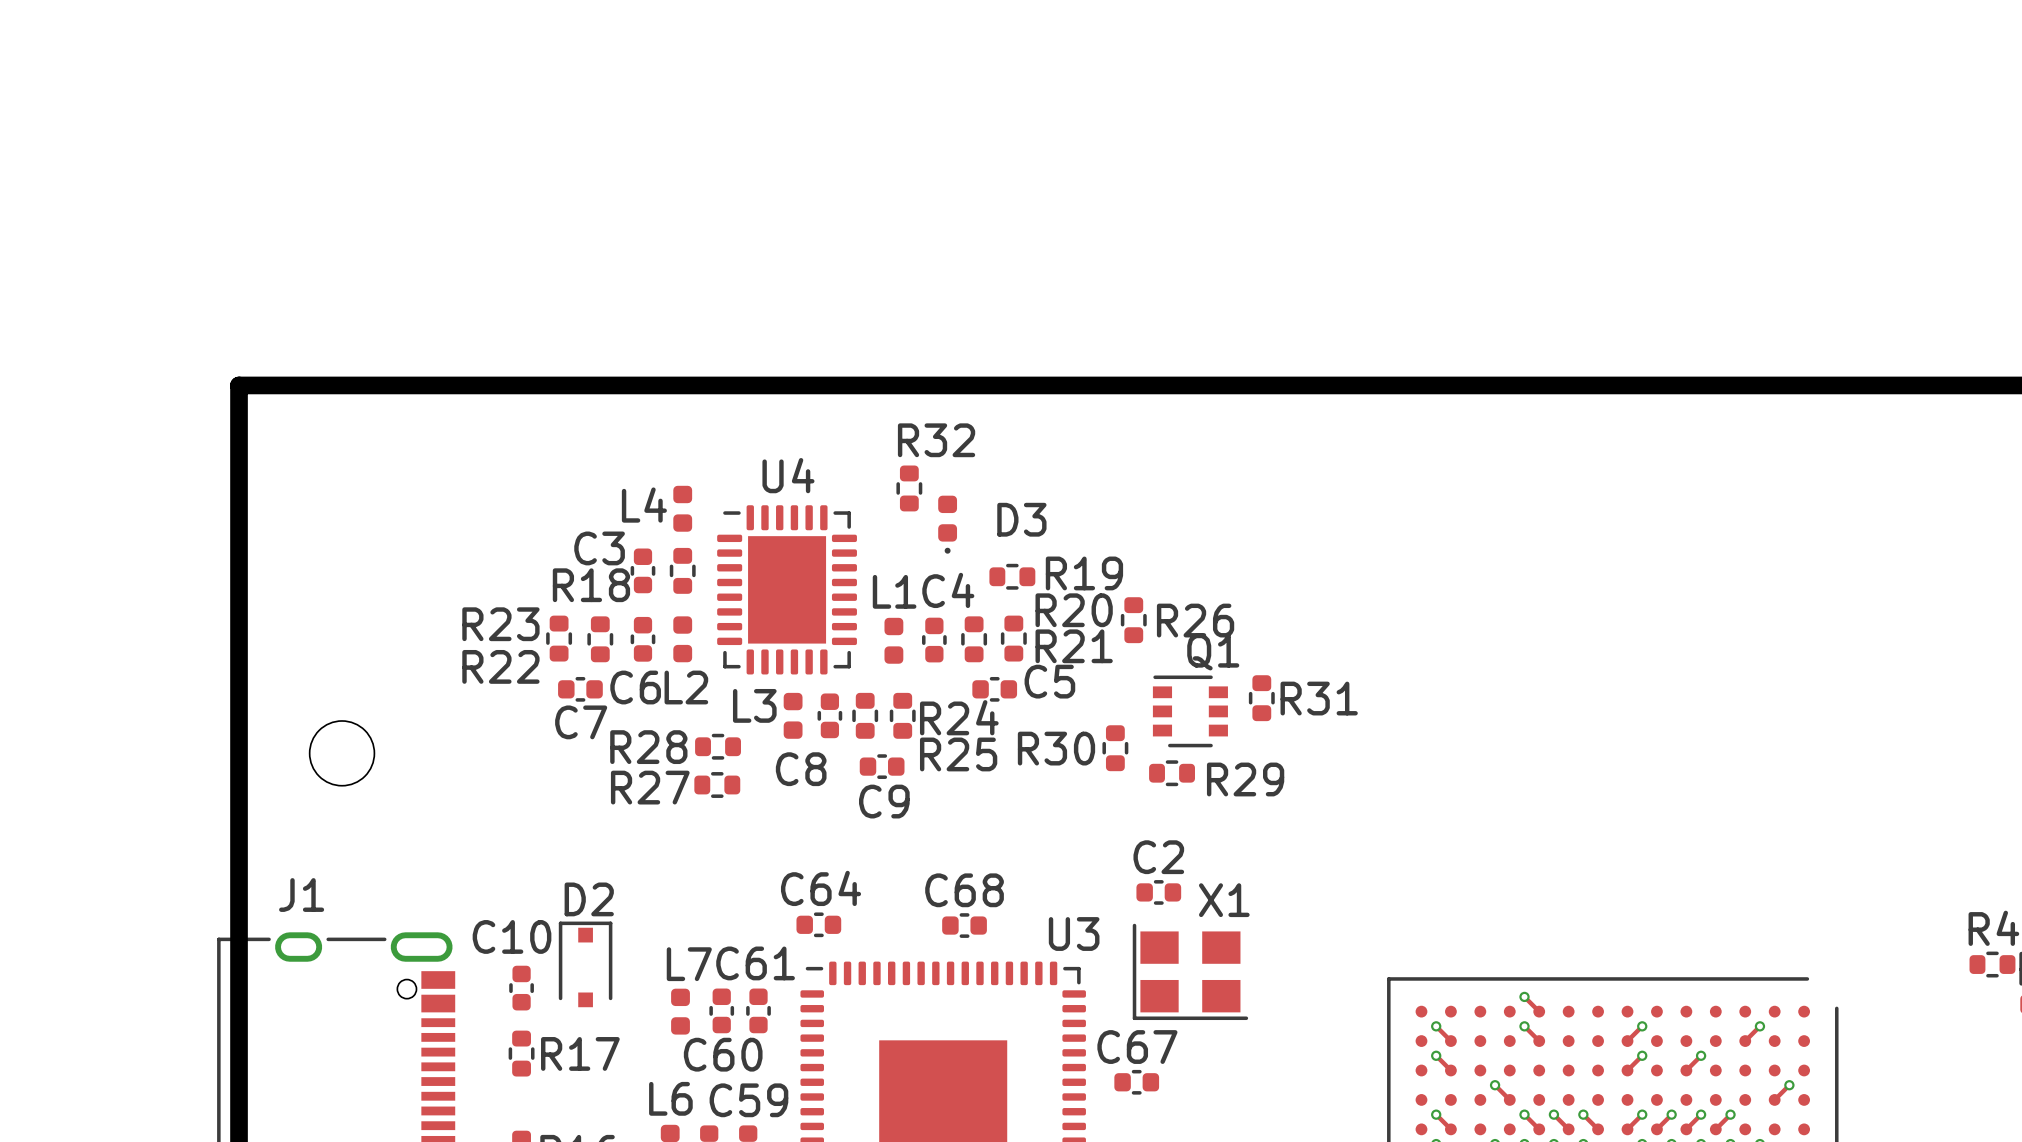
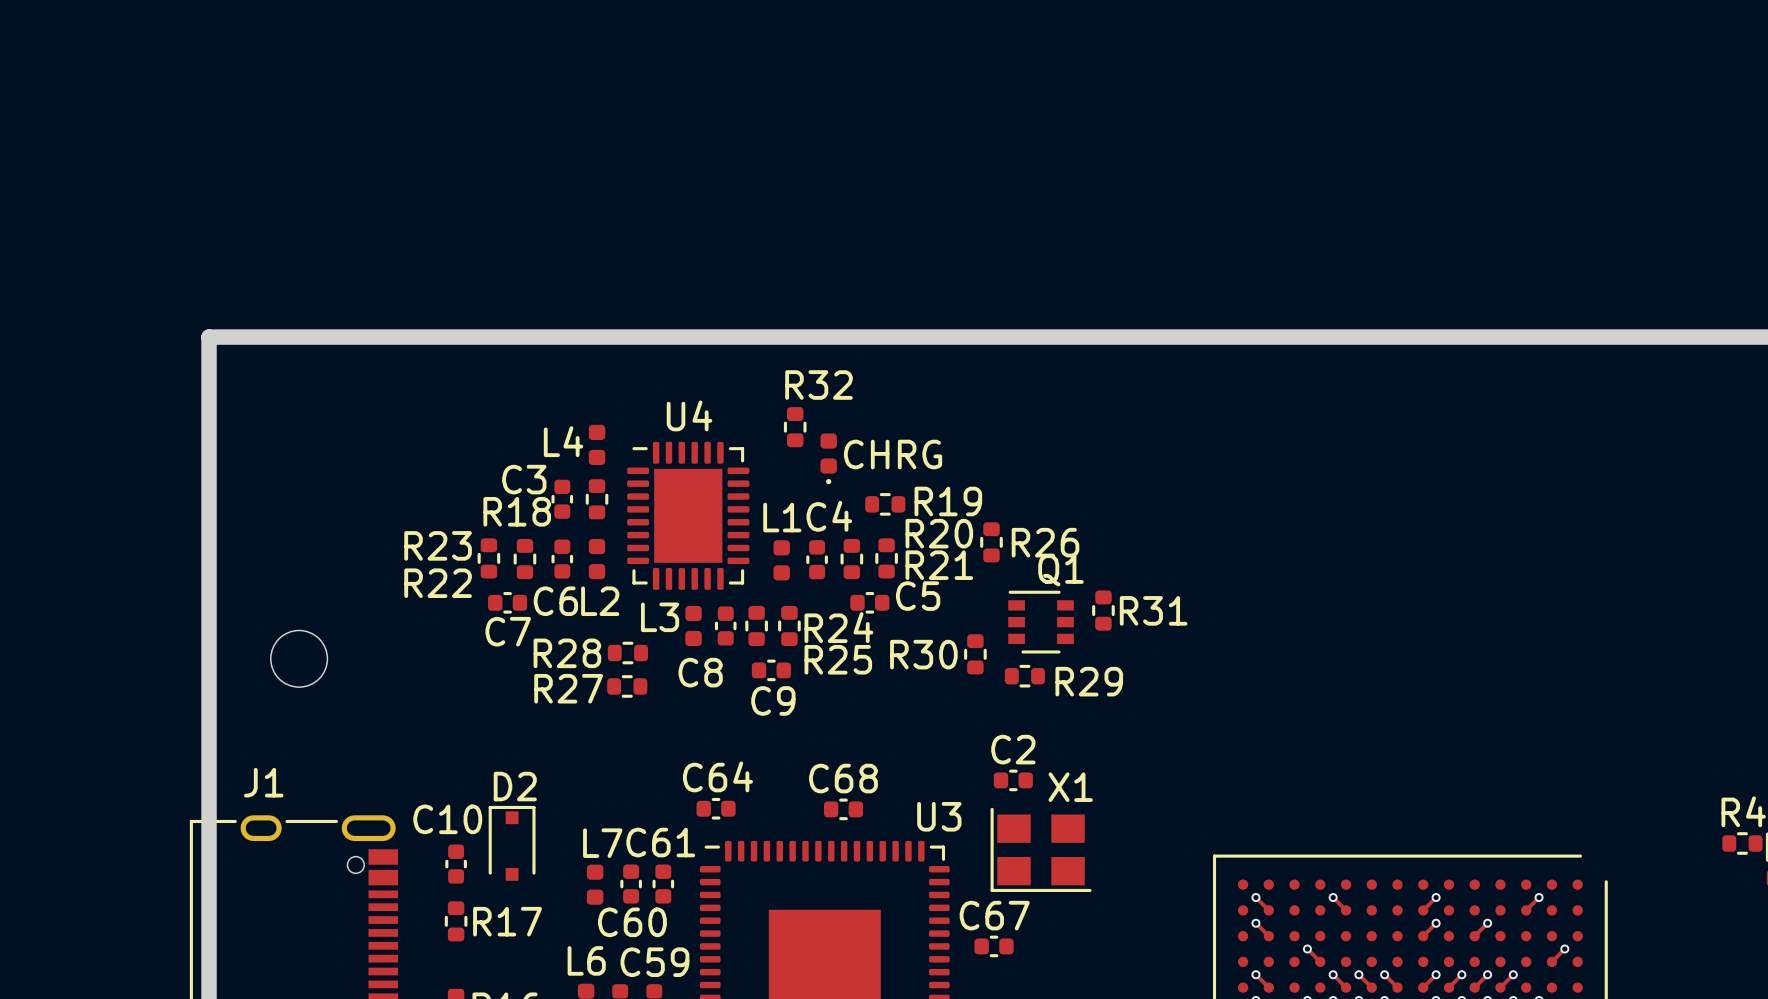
D3 name: D3 (1021, 519) -> CHRG (893, 454)
track: (1524, 996) (1539, 1011) -> none
via: (1524, 996) -> none

